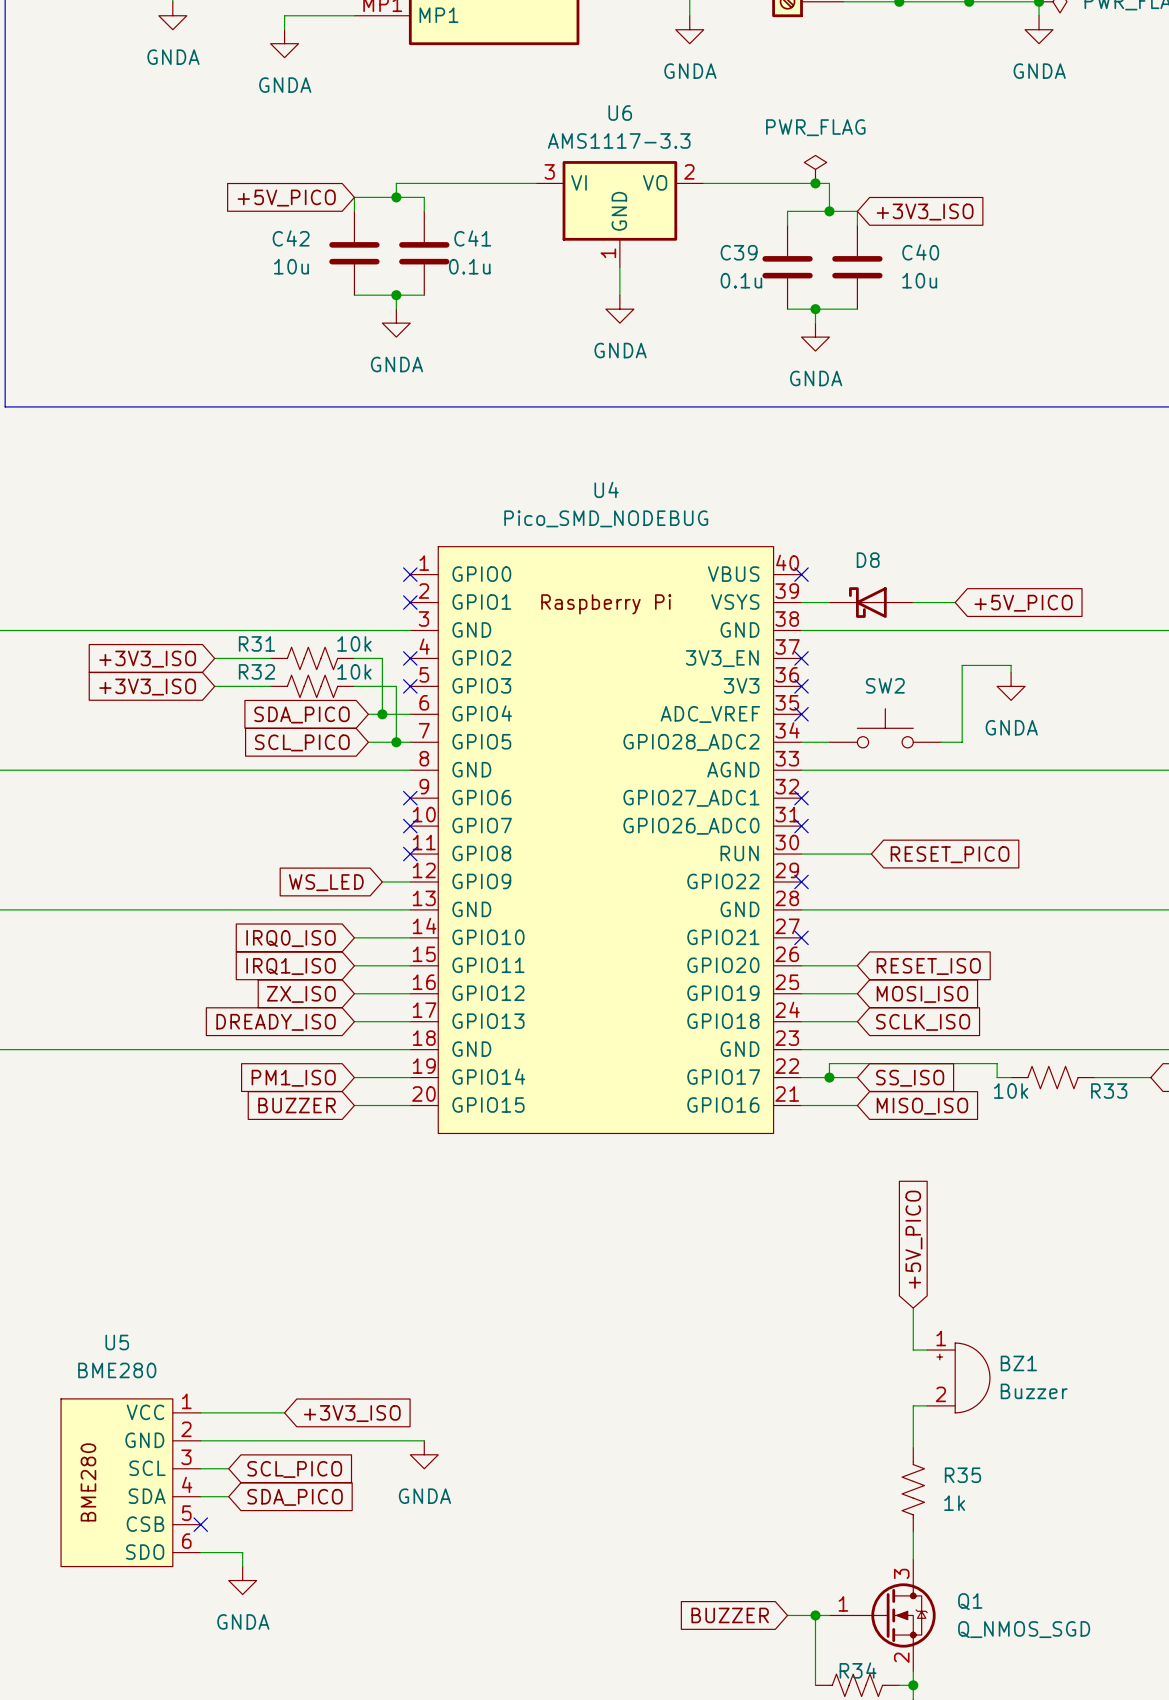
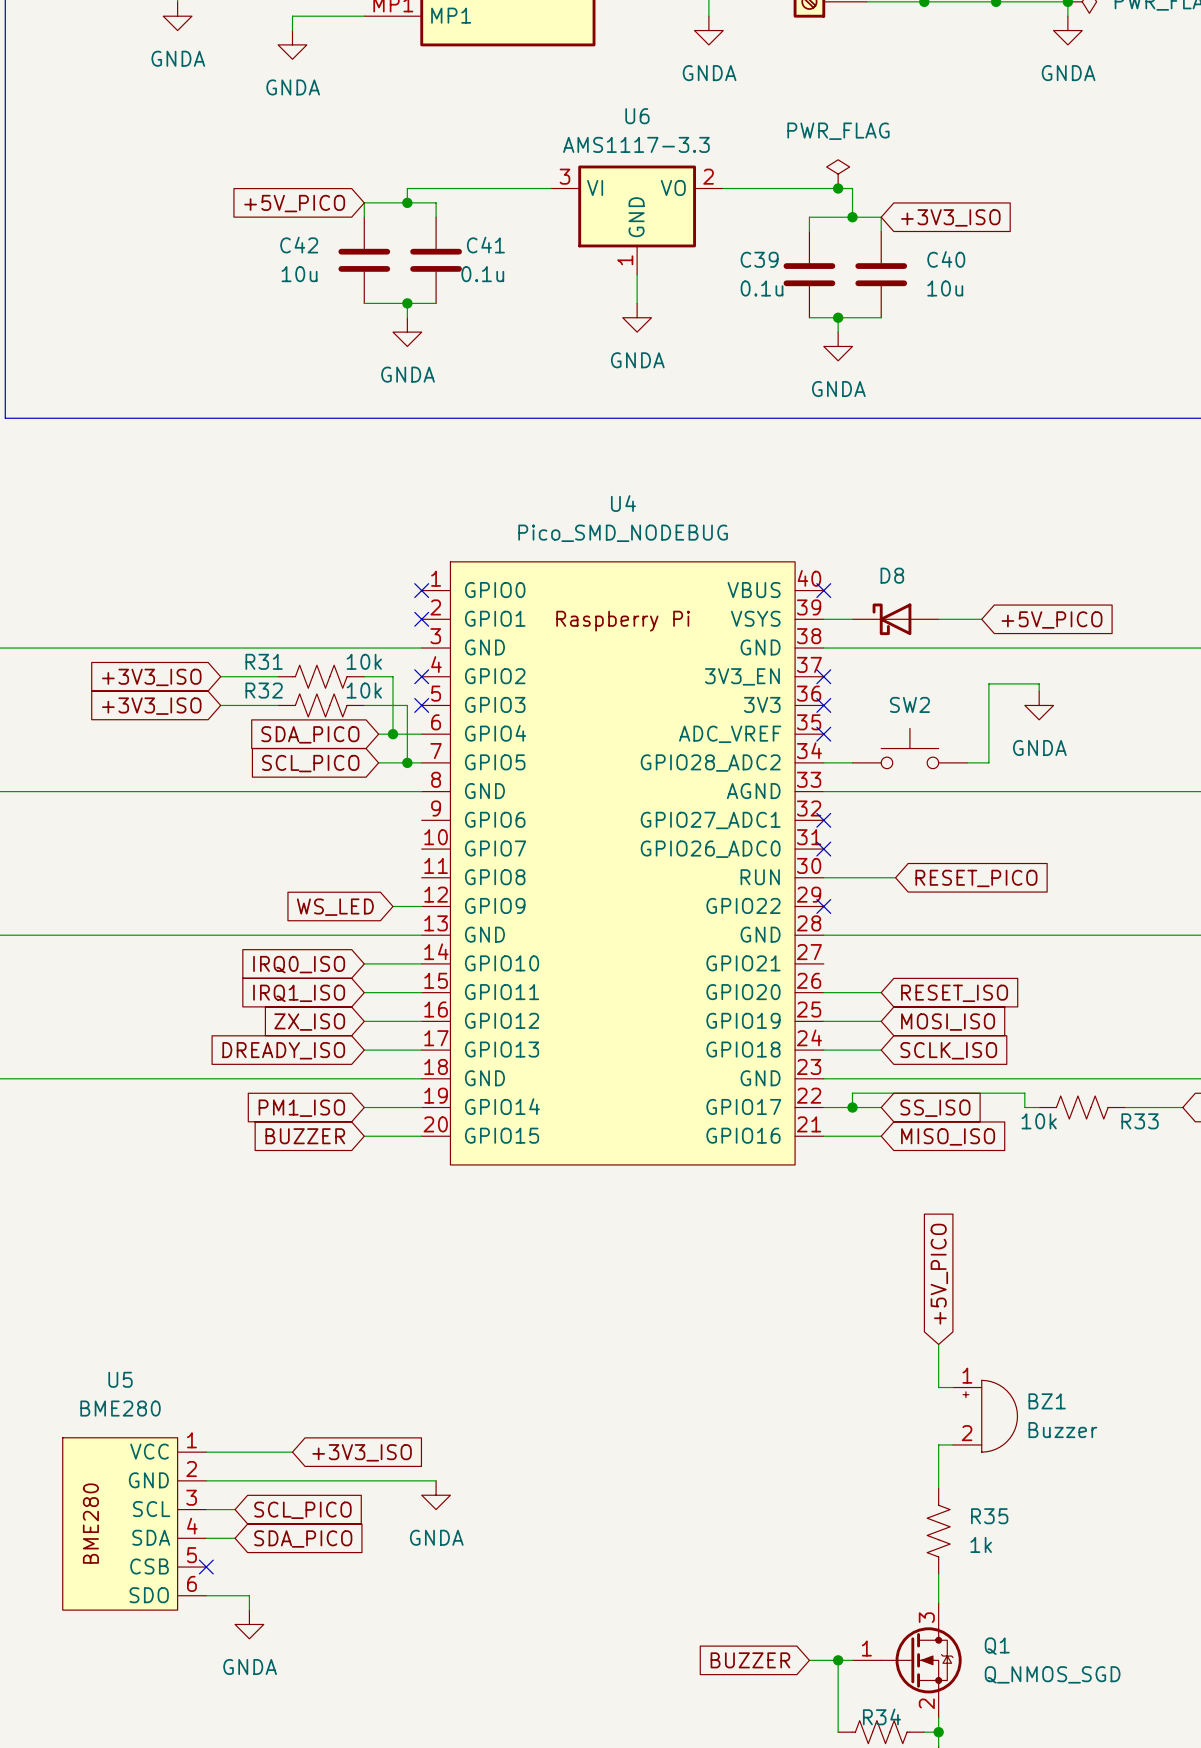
no-connect mark: (410, 798) -> none
no-connect mark: (410, 826) -> none
no-connect mark: (410, 854) -> none
no-connect mark: (801, 937) -> none

